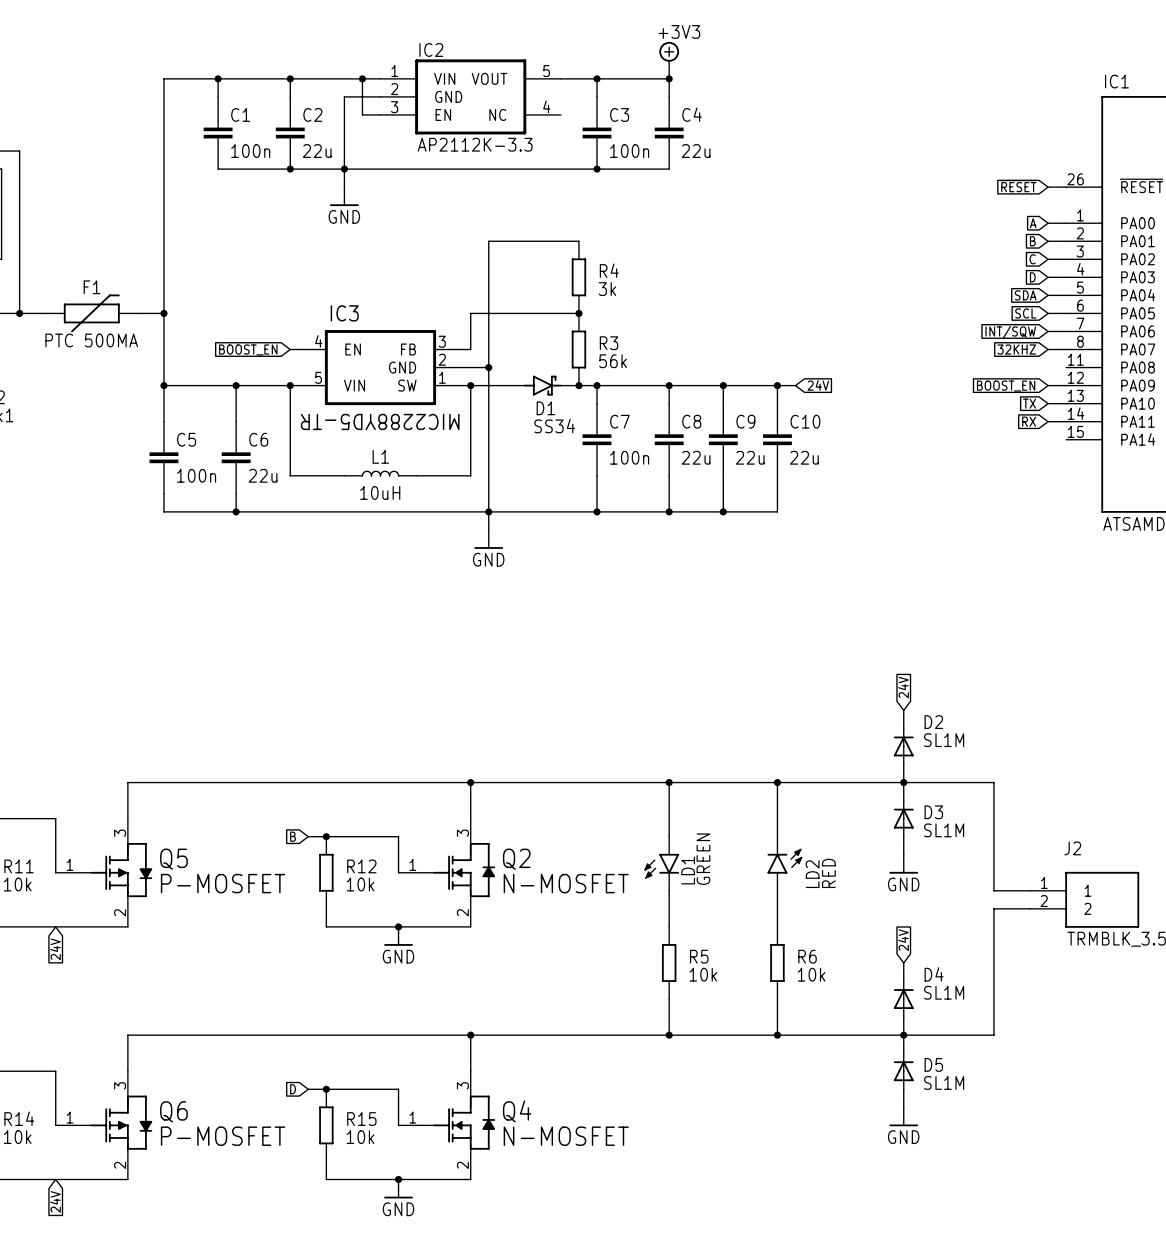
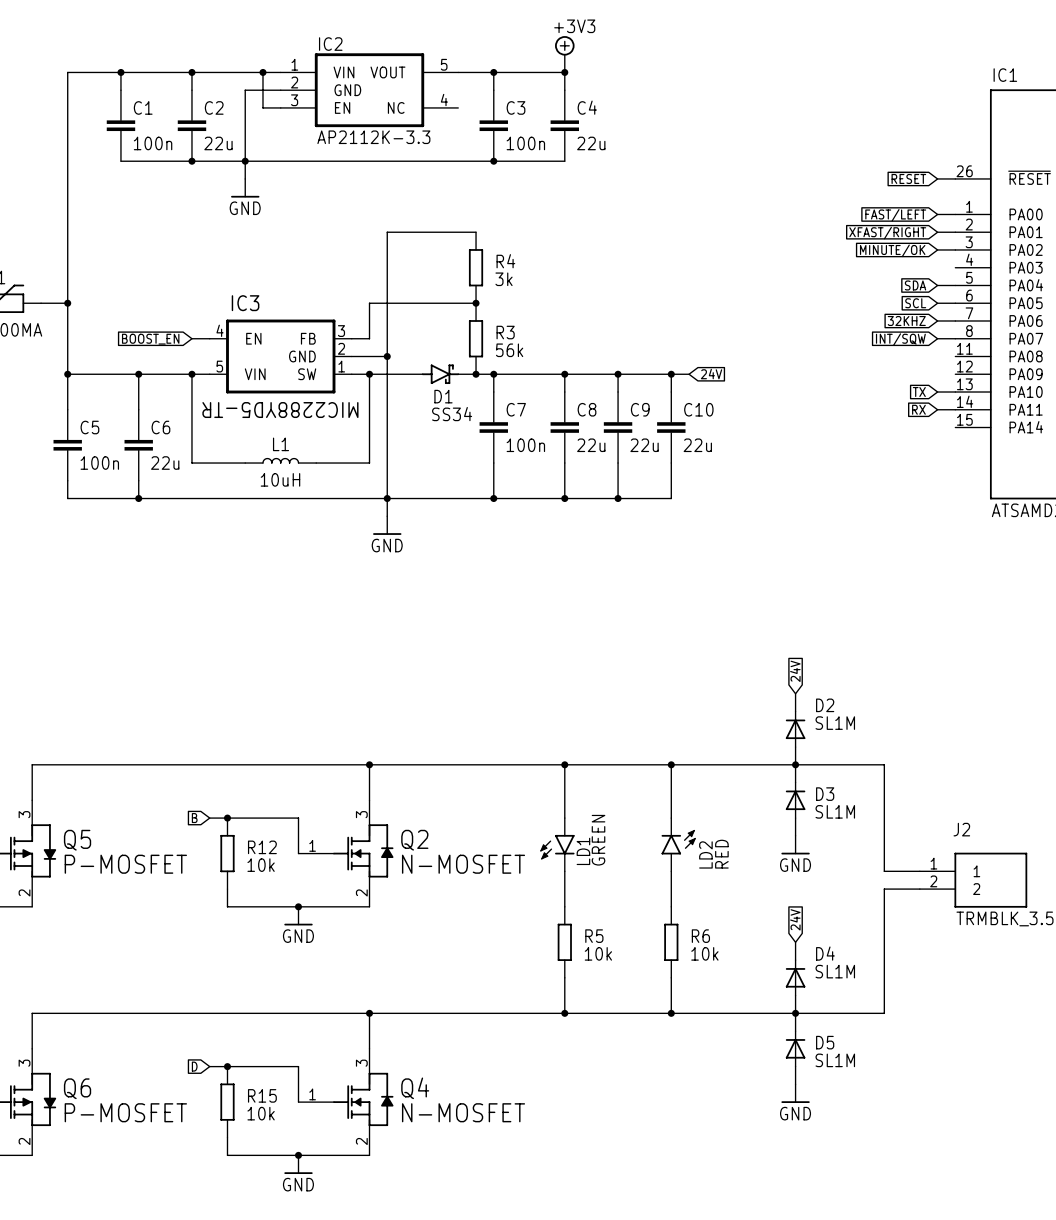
global label: A (1033, 223) -> FAST/LEFT (895, 215)
global label: B (1032, 241) -> XFAST/RIGHT (887, 233)
global label: C (1032, 259) -> MINUTE/OK (892, 250)
global label: D (1032, 277) -> none
wire: (1048, 277) (1066, 277) -> none
global label: INT/SQW (1010, 332) -> 32KHZ (906, 320)
global label: 32KHZ (1016, 349) -> INT/SQW (900, 339)
wire: (1048, 385) (1066, 385) -> none
global label: BOOST_EN (1006, 386) -> none

